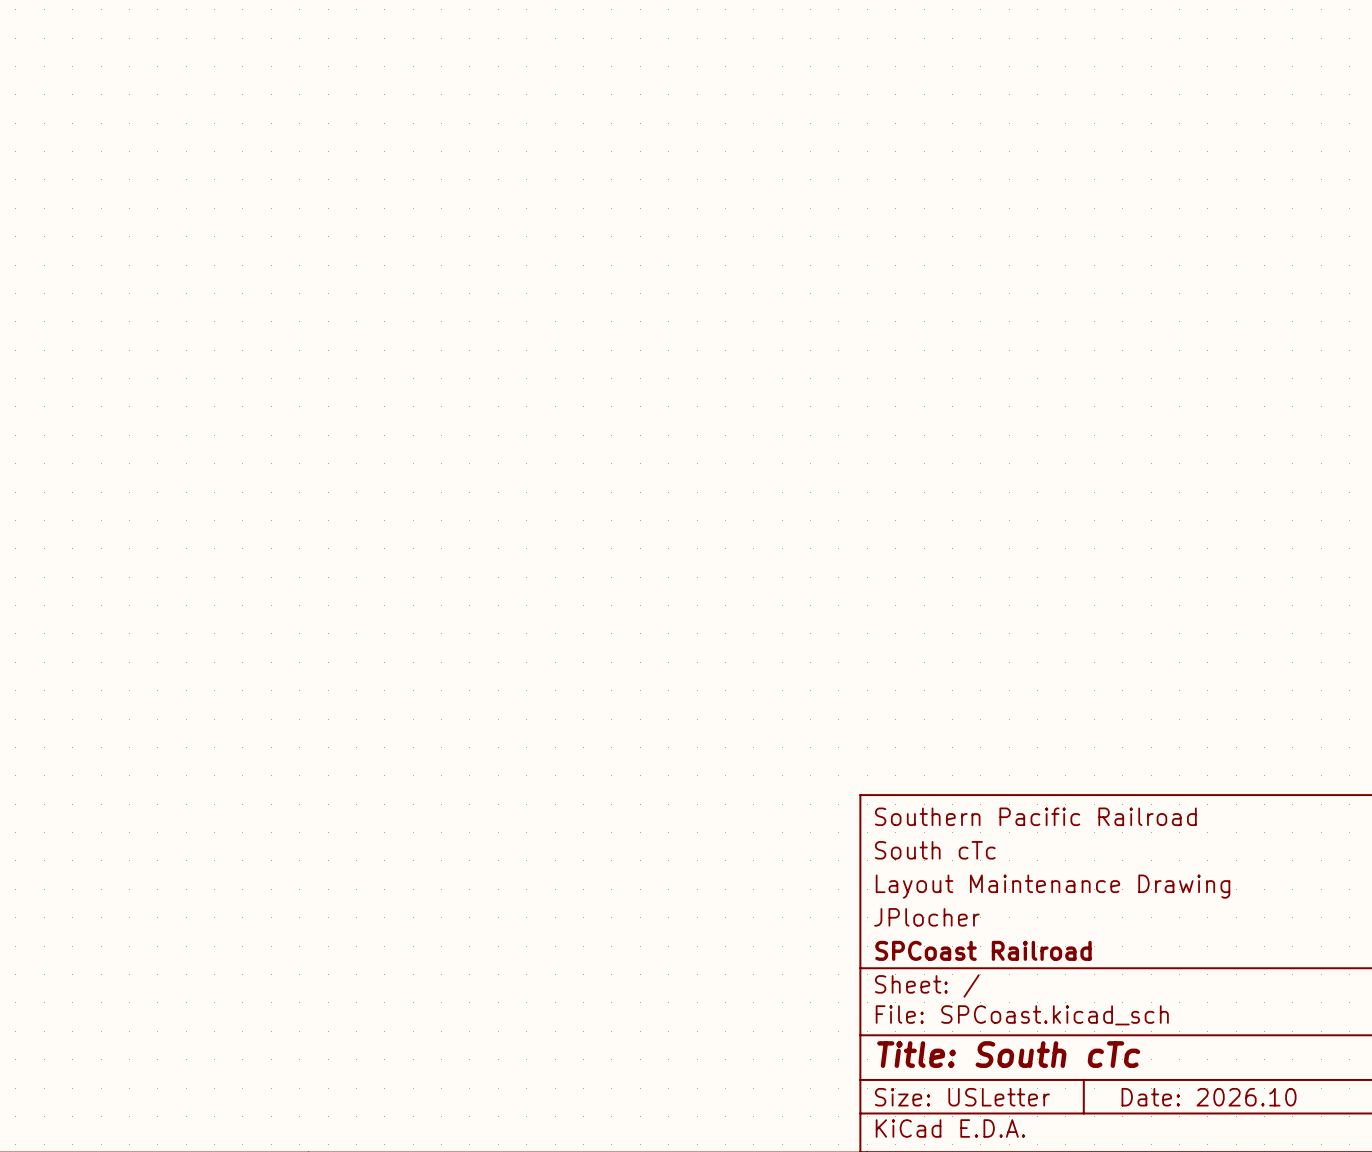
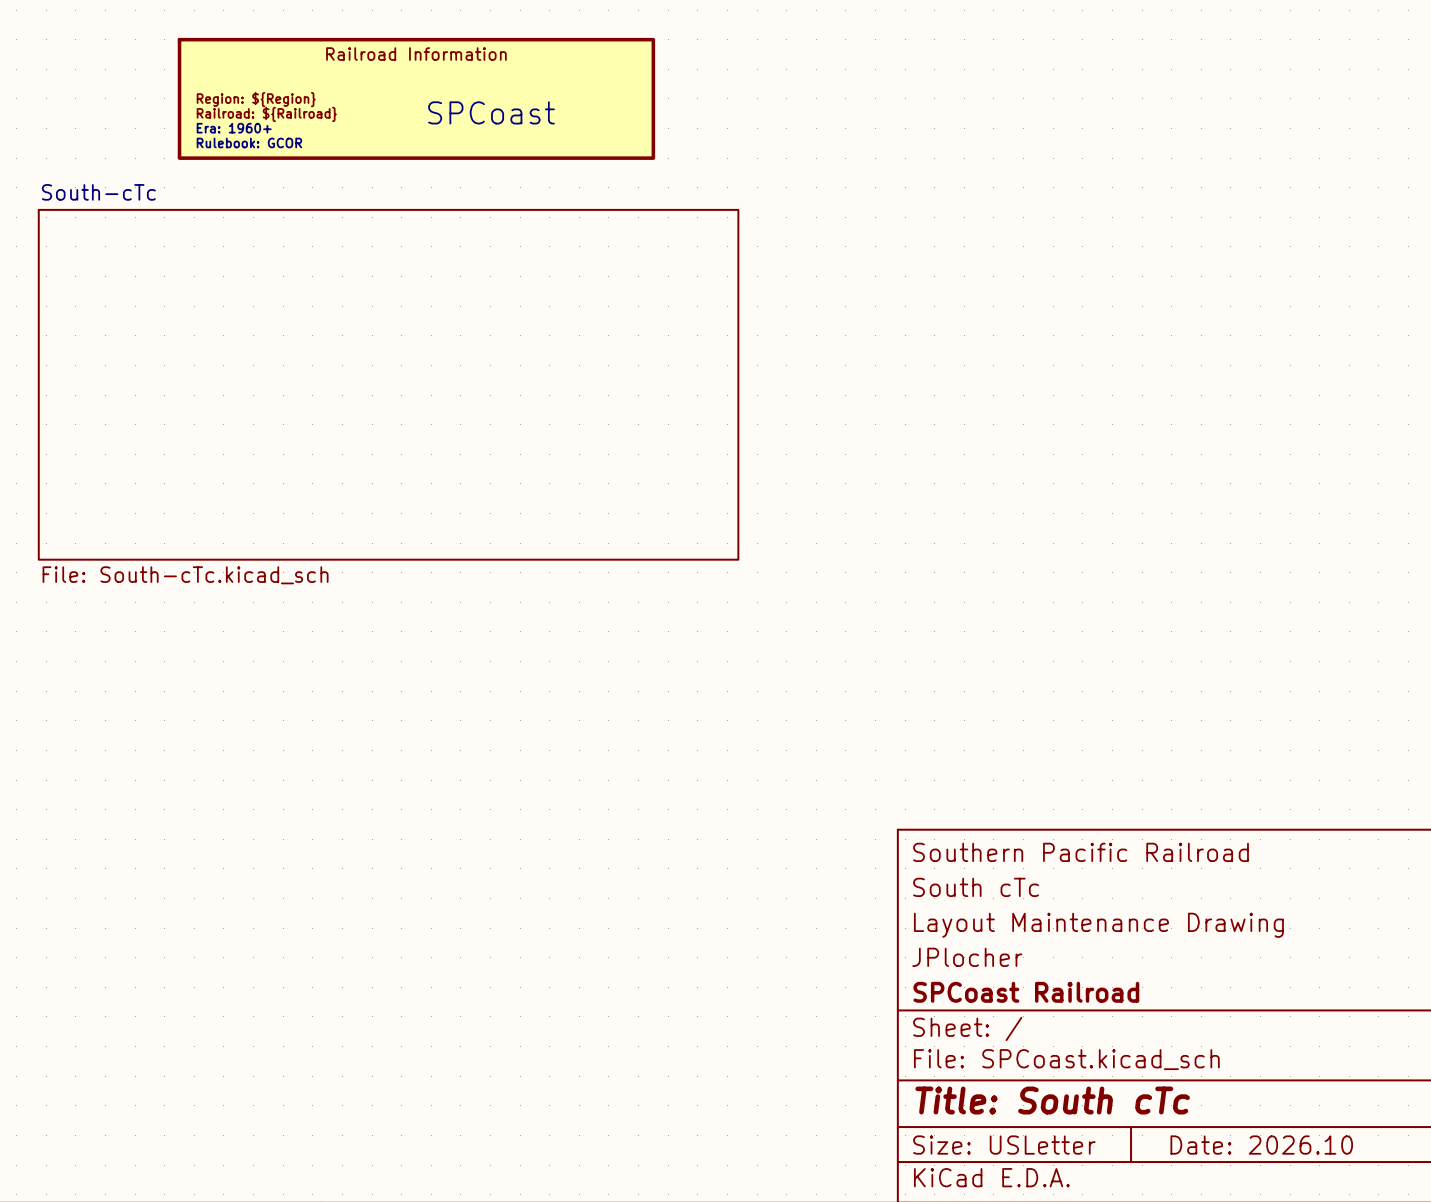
part: none -> (416, 98)
sheet South-cTc: none -> File: South-cTc.kicad_sch (388, 384)

